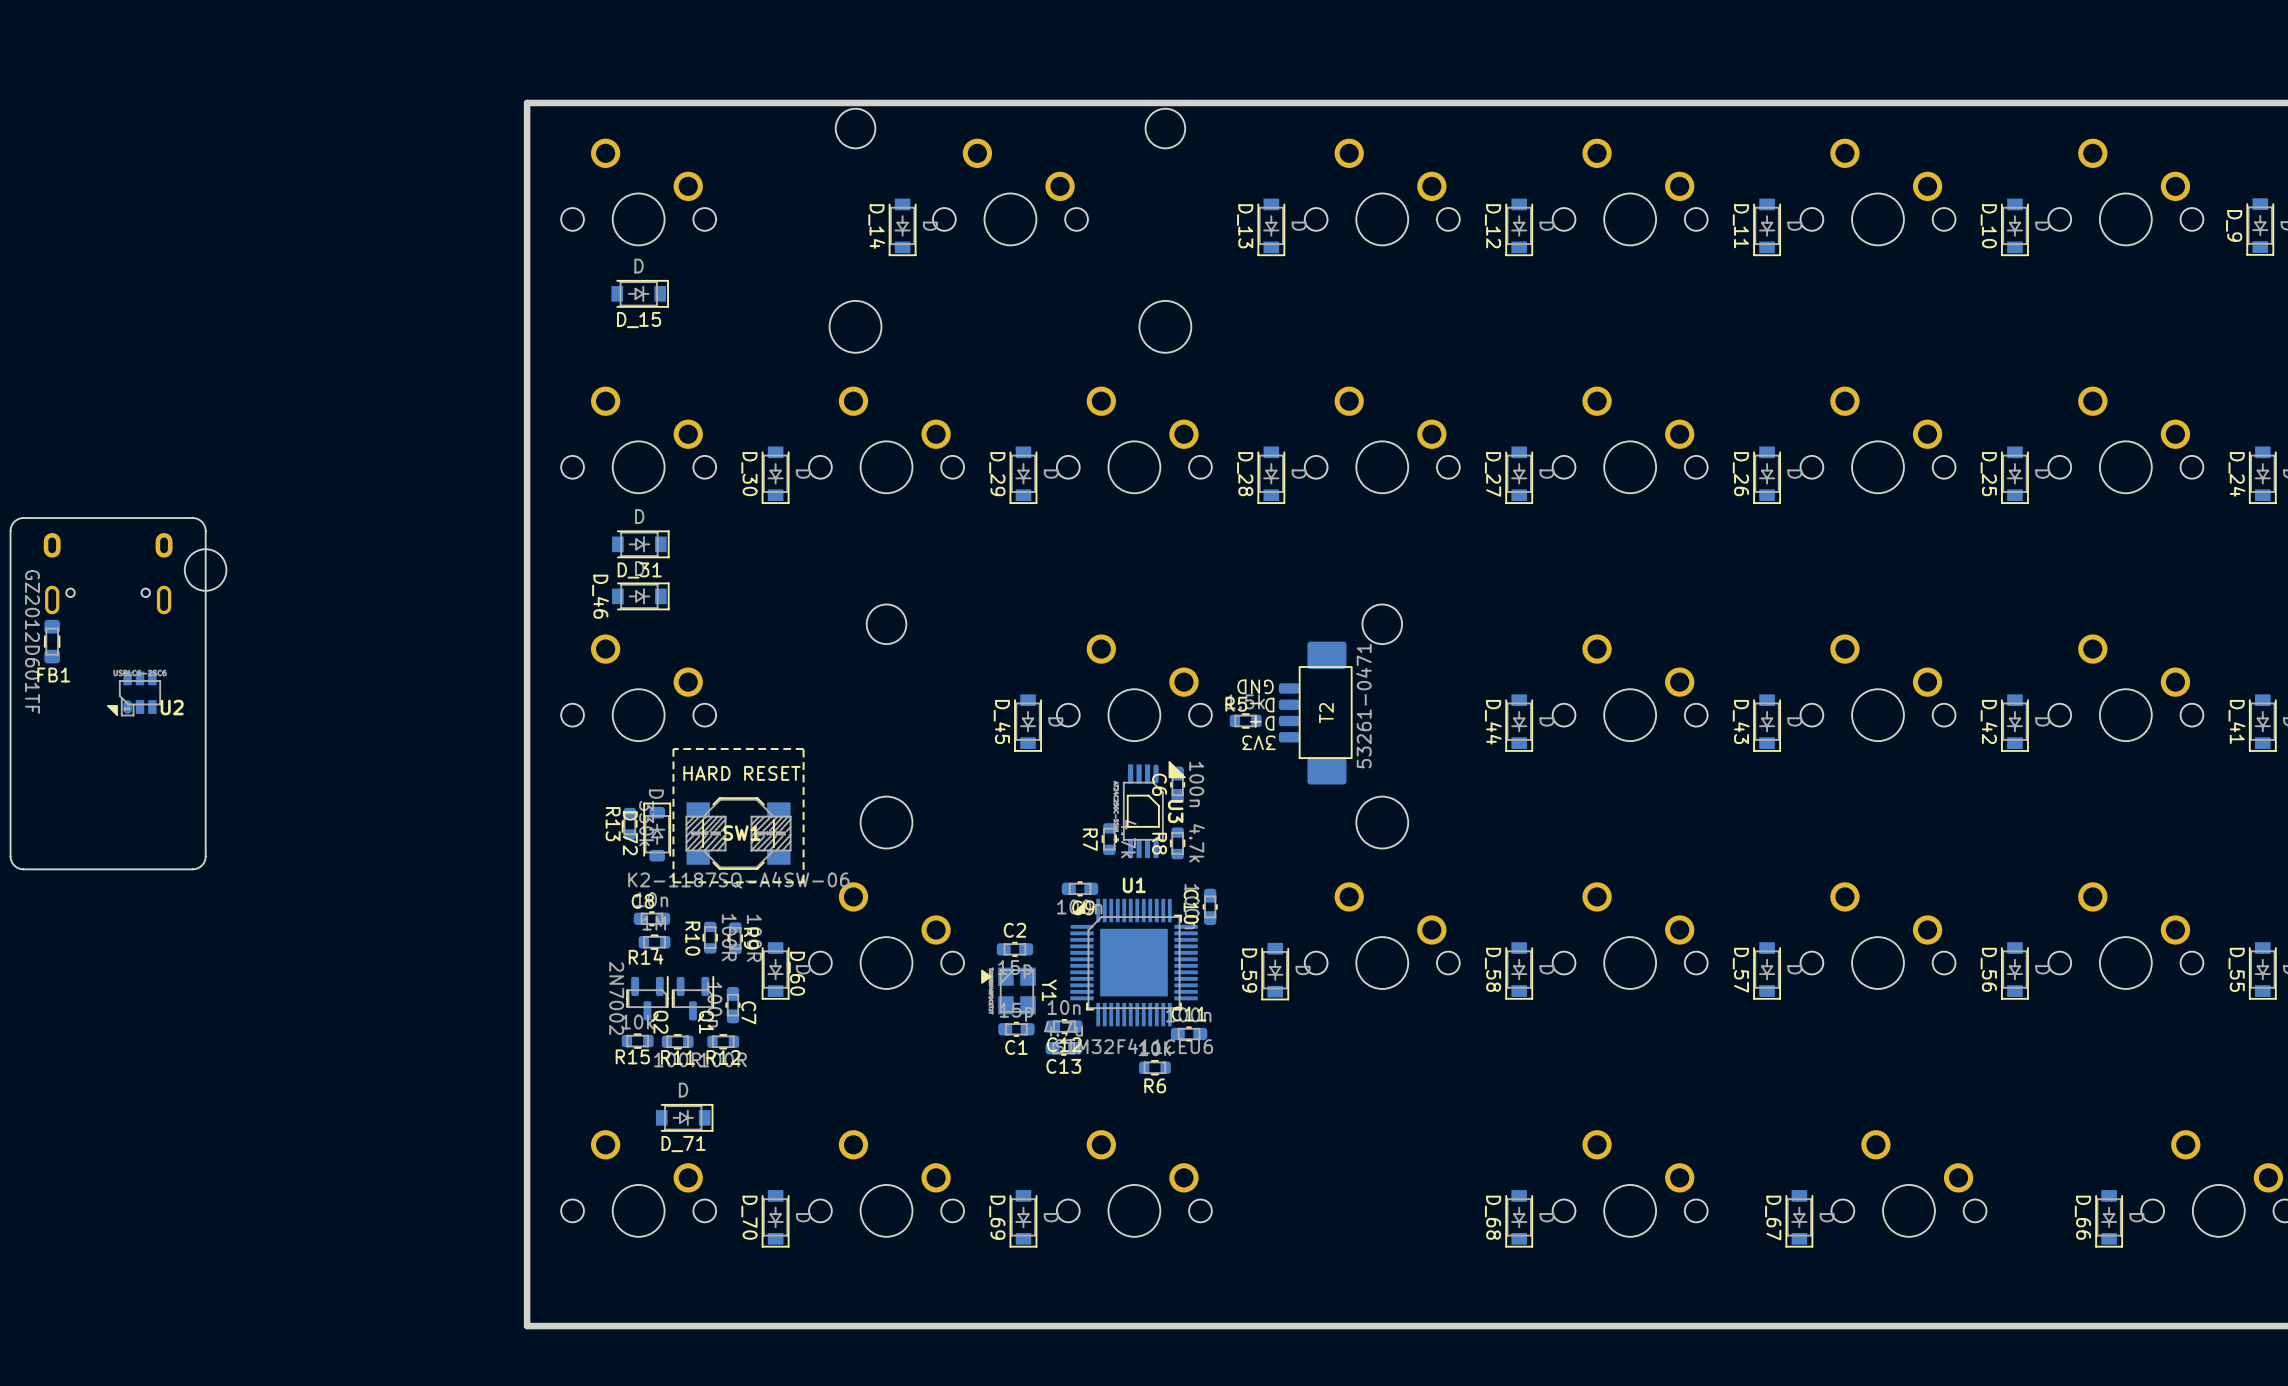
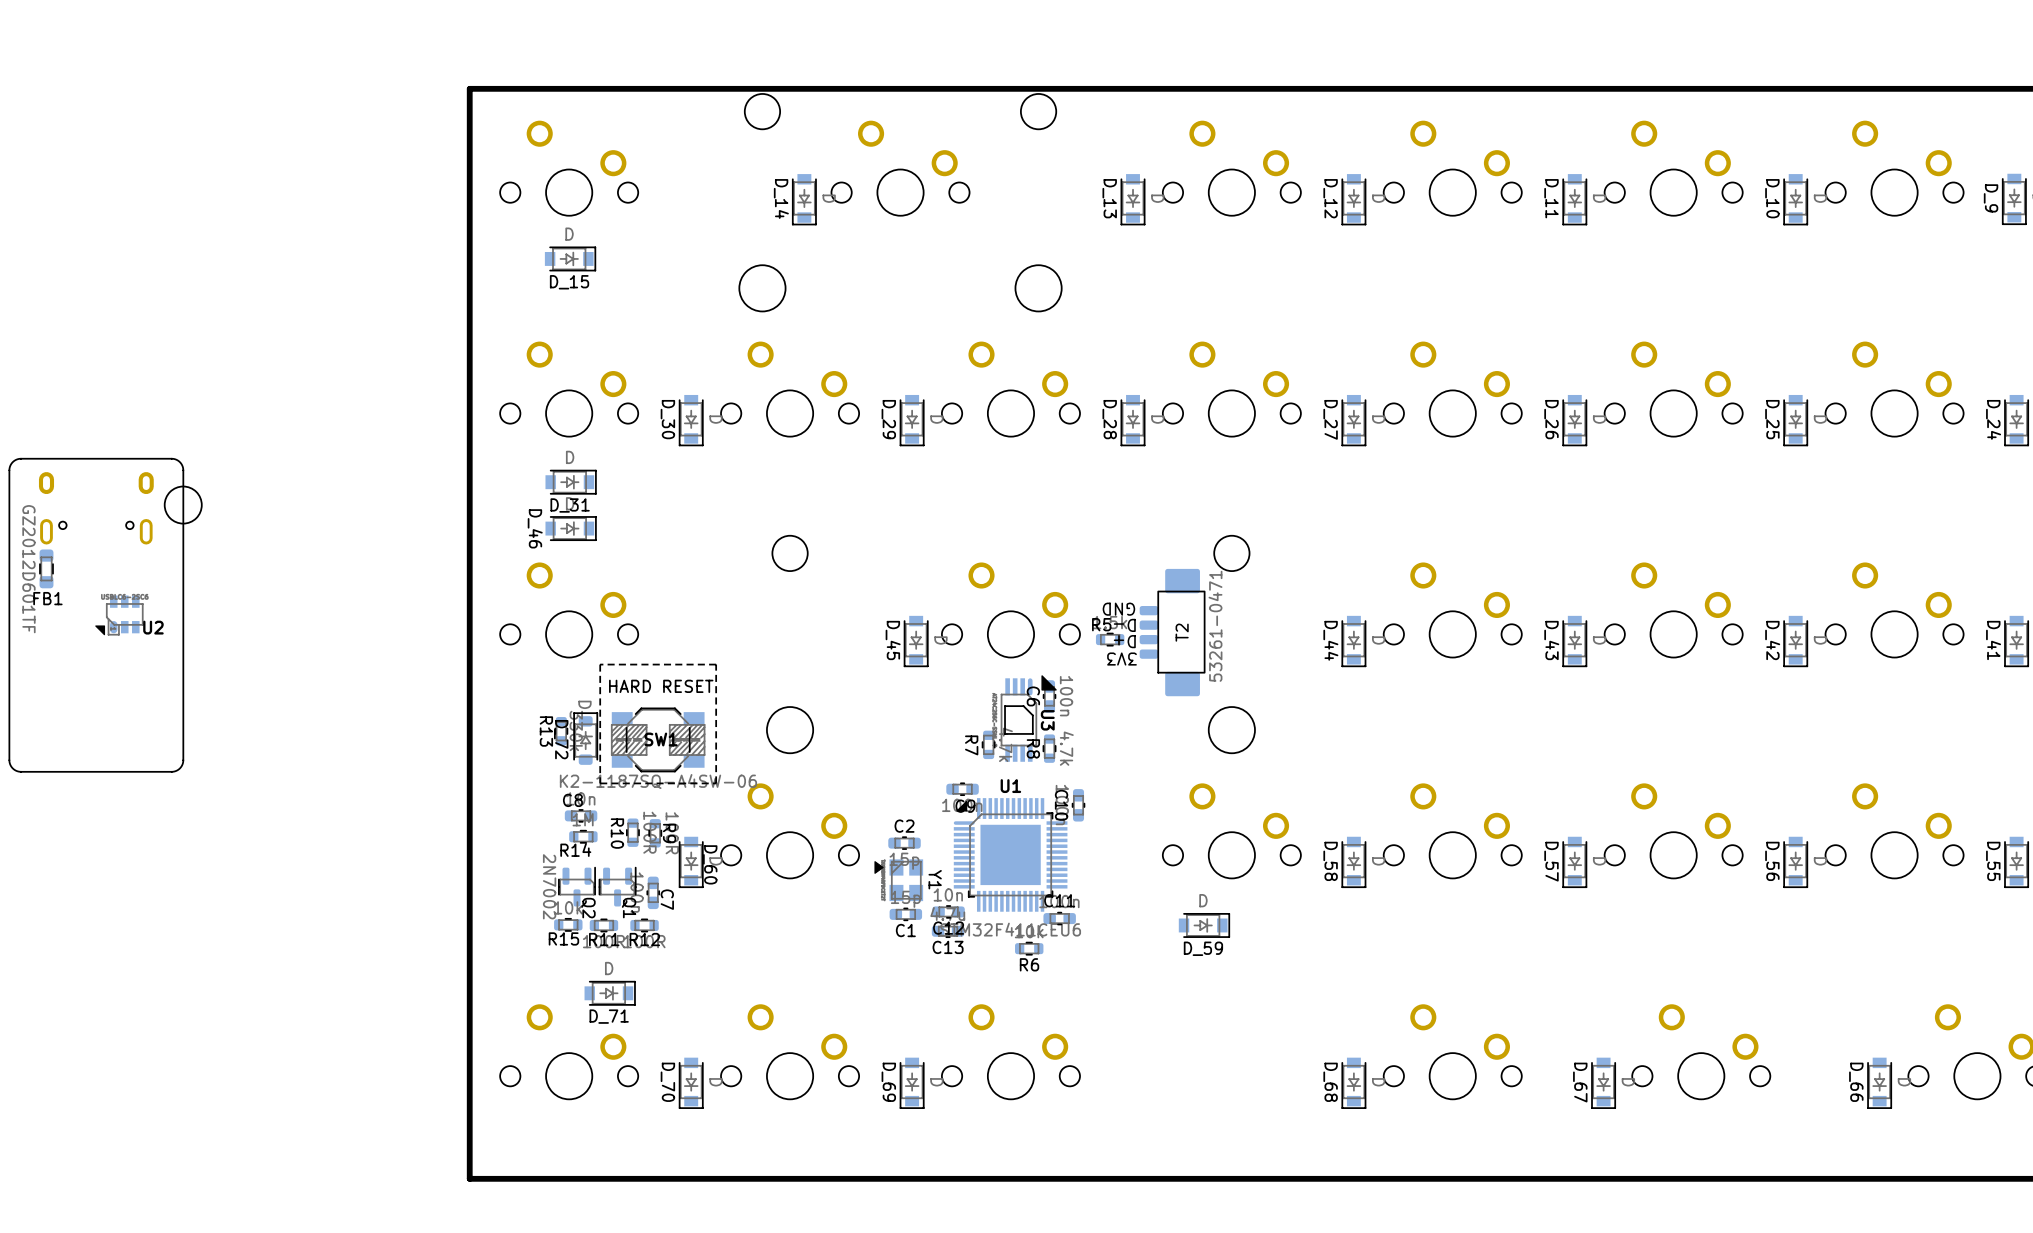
D_59 rotation: 0° (1275, 971) -> 90° counterclockwise (1204, 925)
D_59 position: (1275, 971) -> (1204, 925)

